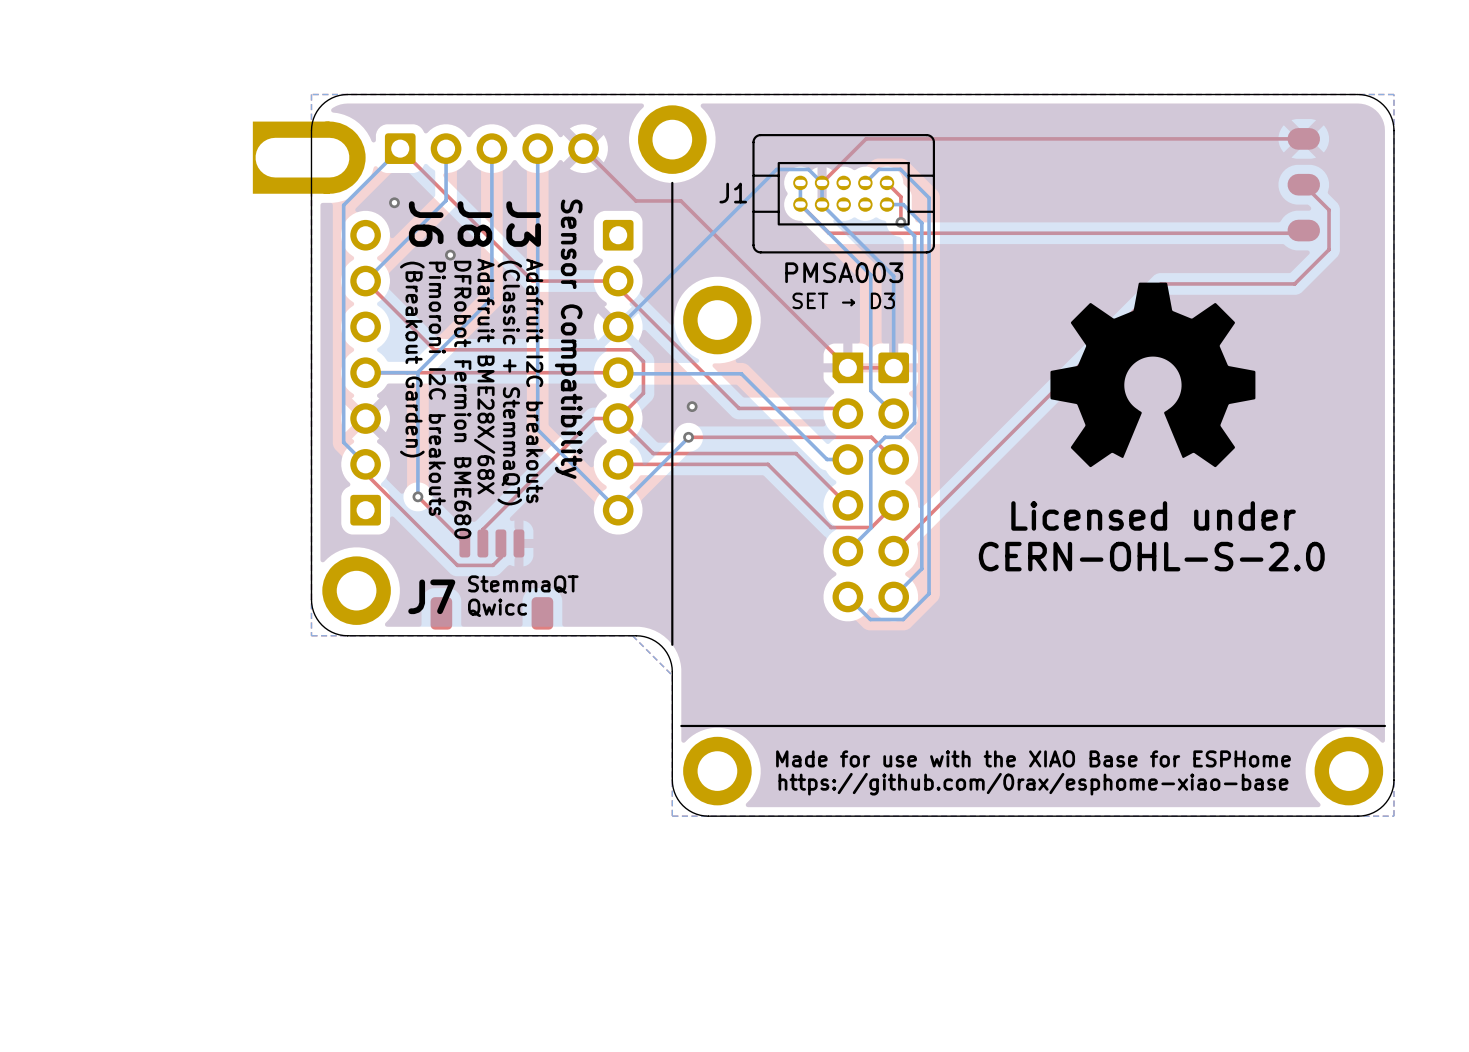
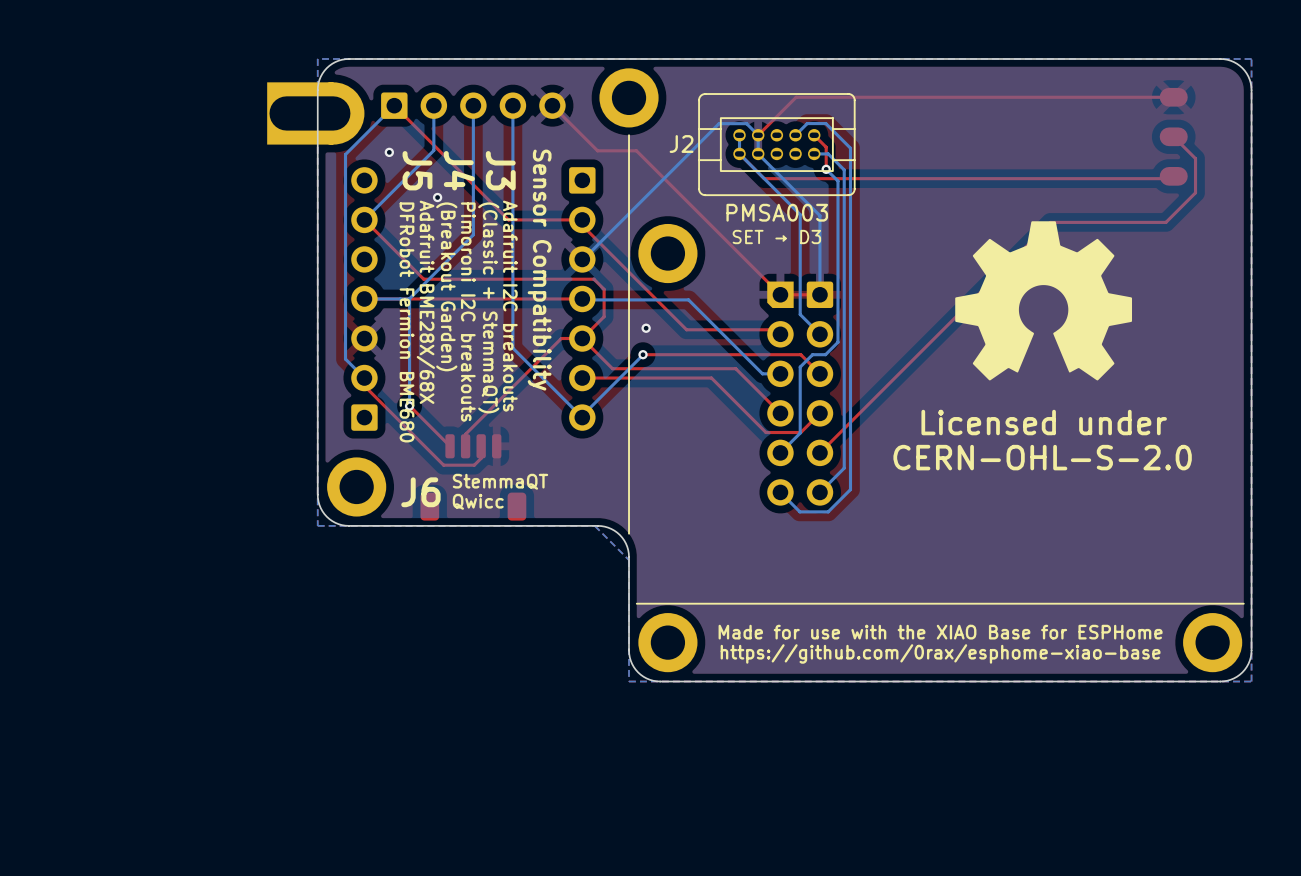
J1 name: J1 (733, 193) -> J2 (681, 144)
text: J6 (426, 224) -> J5 (417, 170)
text: J8 (474, 224) -> J4 (459, 170)
text: (Breakout Garden) (412, 359) -> DFRobot Fermion BME680 (407, 322)
text: Adafruit BME28X/68X (484, 376) -> Pimoroni I2C breakouts (468, 312)
text: Pimoroni I2C breakouts (437, 388) -> Adafruit BME28X/68X (425, 302)
text: DFRobot Fermion BME680 (462, 399) -> (Breakout Garden) (446, 286)
text: J7 (431, 596) -> J6 (420, 492)

